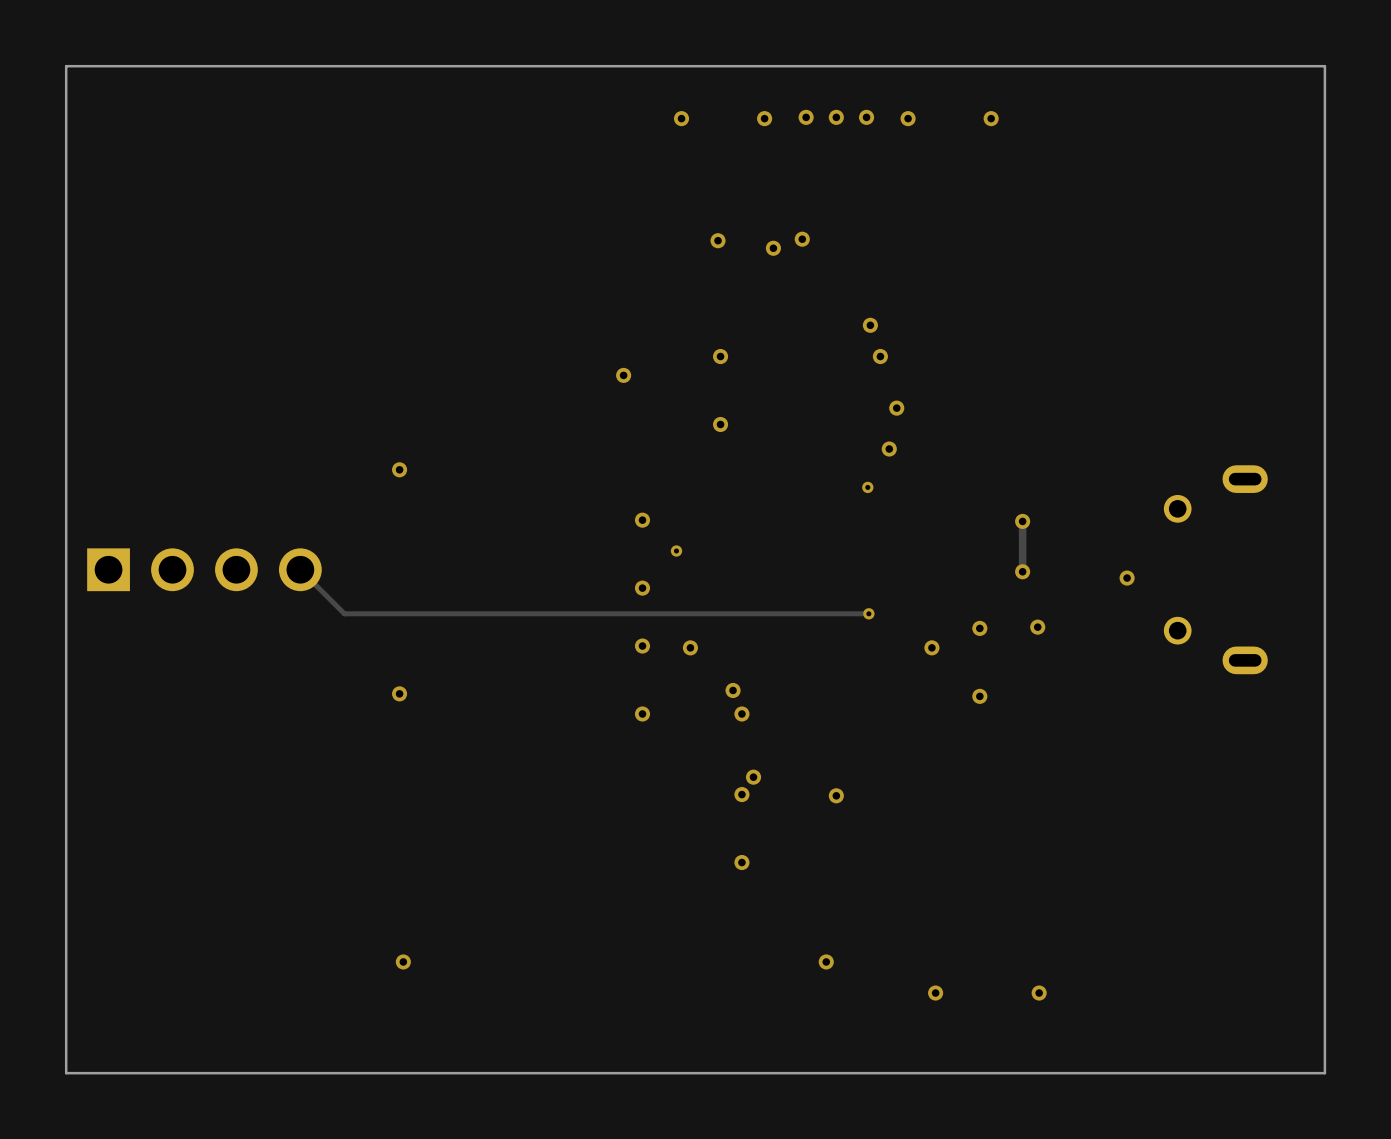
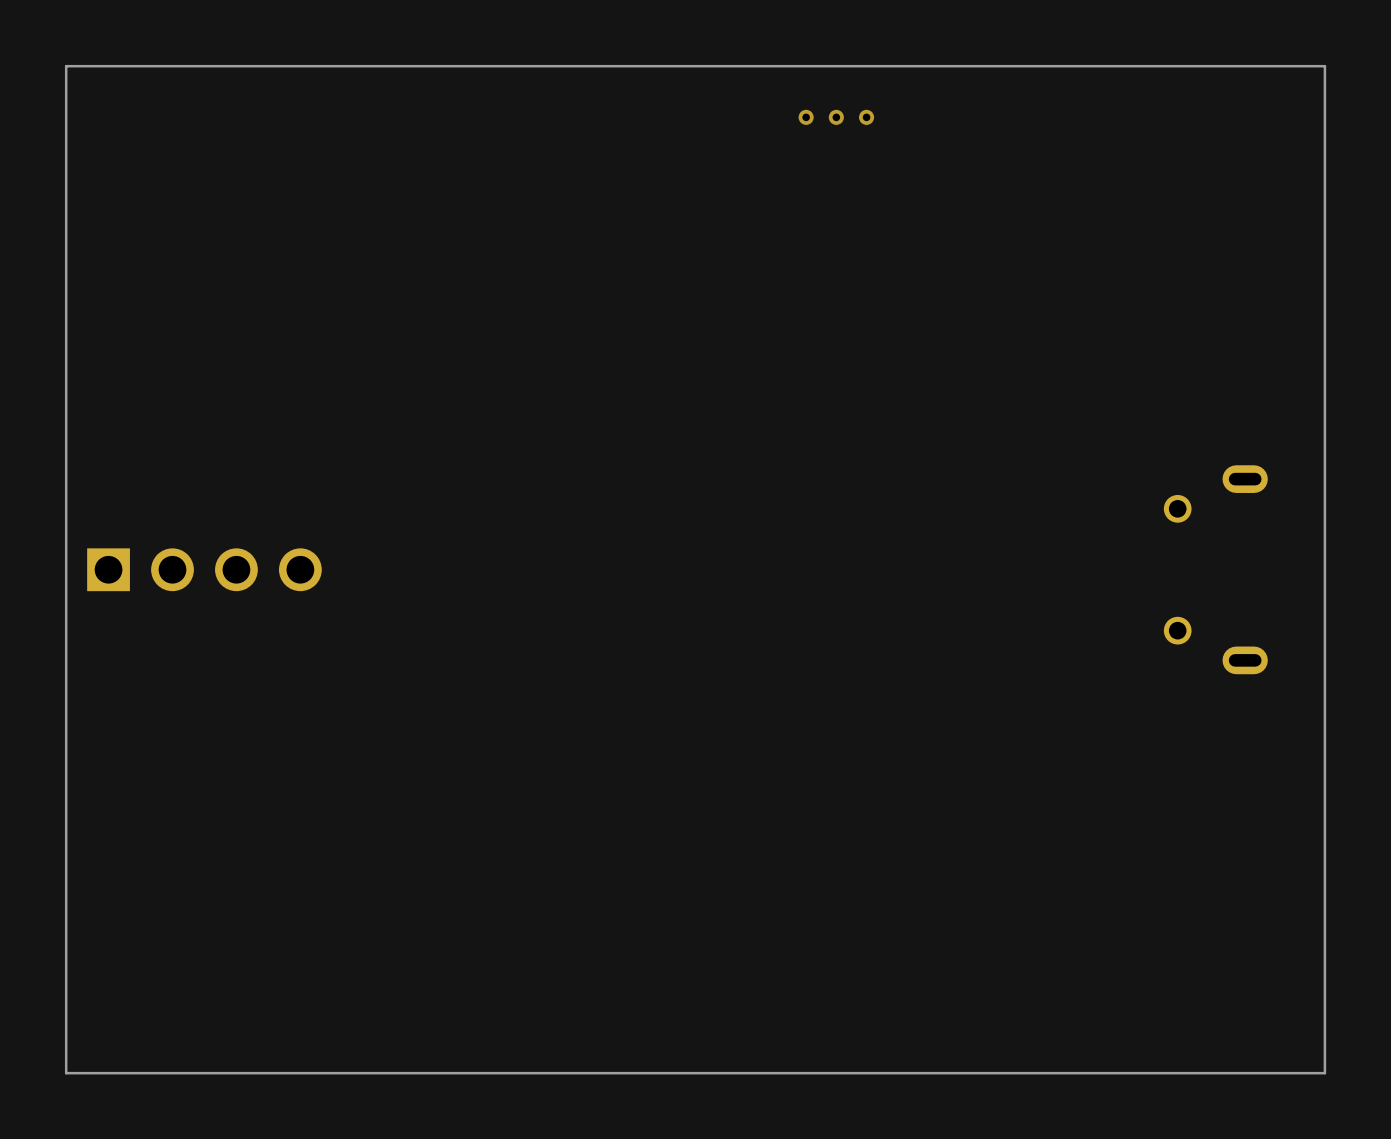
via: (681, 118) -> none
via: (764, 118) -> none
via: (908, 118) -> none
via: (991, 118) -> none
via: (802, 239) -> none
via: (718, 240) -> none
via: (773, 248) -> none
via: (870, 325) -> none
via: (720, 356) -> none
via: (880, 356) -> none
via: (623, 375) -> none
via: (896, 408) -> none
via: (720, 424) -> none
via: (889, 449) -> none
via: (399, 469) -> none
via: (867, 487) -> none
via: (642, 520) -> none
track: (1022, 521) (1022, 571) -> none
via: (1022, 521) -> none
via: (676, 550) -> none
track: (300, 569) (344, 613) (868, 613) -> none
via: (1022, 571) -> none
via: (1127, 578) -> none
via: (642, 588) -> none
via: (868, 613) -> none
via: (1037, 627) -> none
via: (979, 628) -> none
via: (642, 646) -> none
via: (690, 647) -> none
via: (931, 647) -> none
via: (733, 690) -> none
via: (399, 693) -> none
via: (979, 696) -> none
via: (642, 713) -> none
via: (741, 713) -> none
via: (753, 777) -> none
via: (741, 794) -> none
via: (836, 795) -> none
via: (741, 862) -> none
via: (403, 961) -> none
via: (826, 961) -> none
via: (935, 993) -> none
via: (1039, 993) -> none

